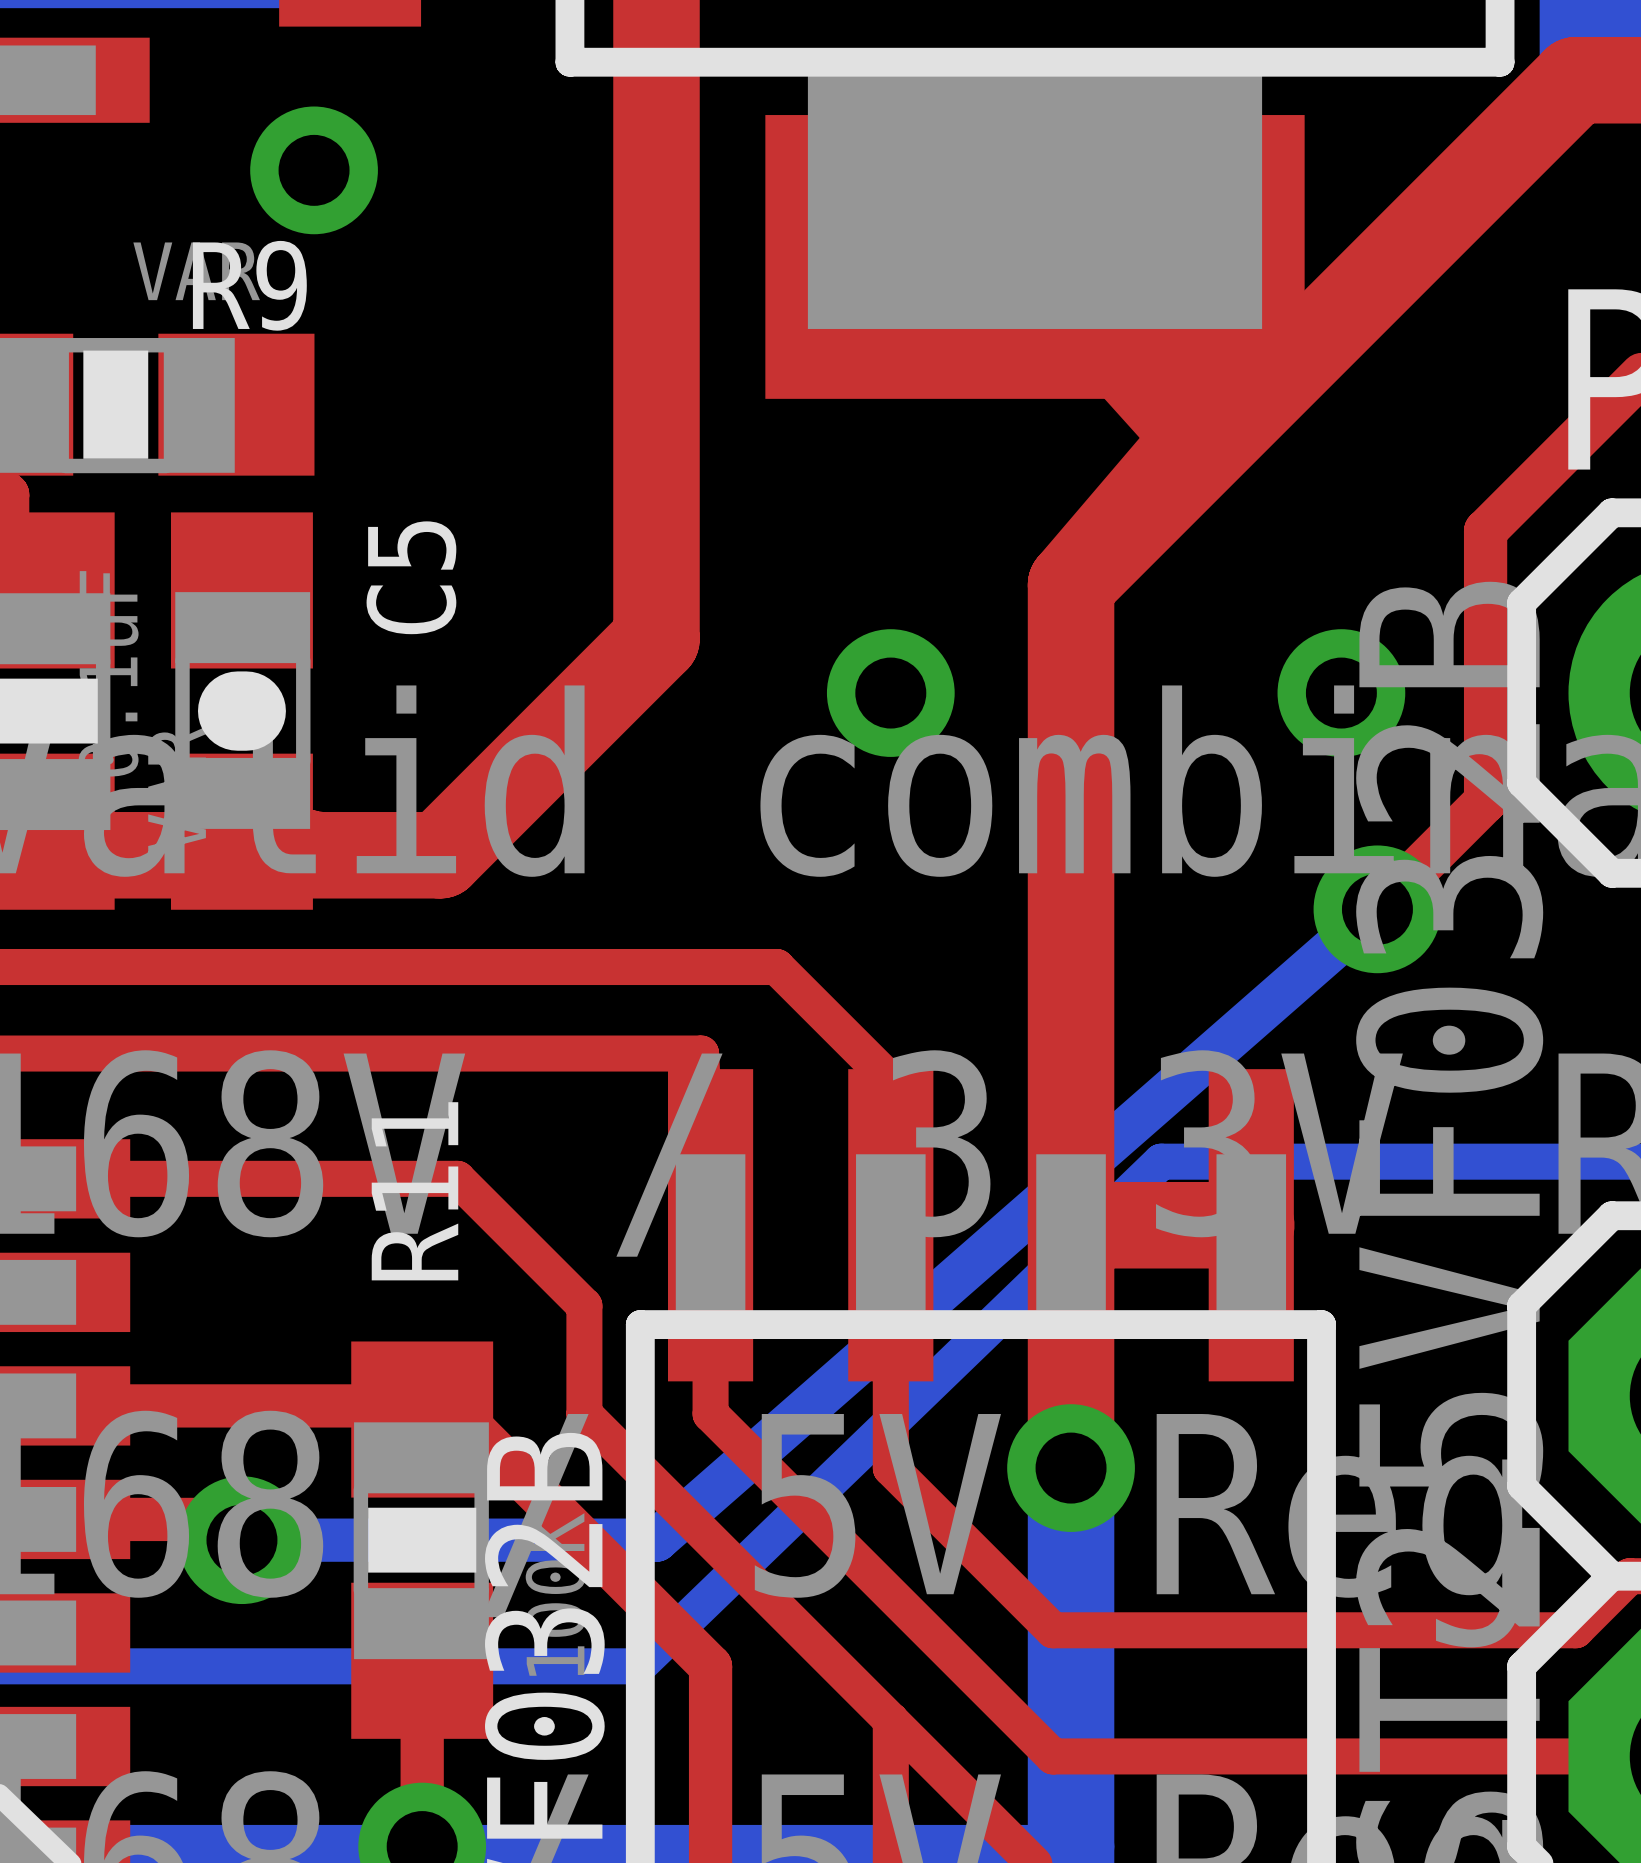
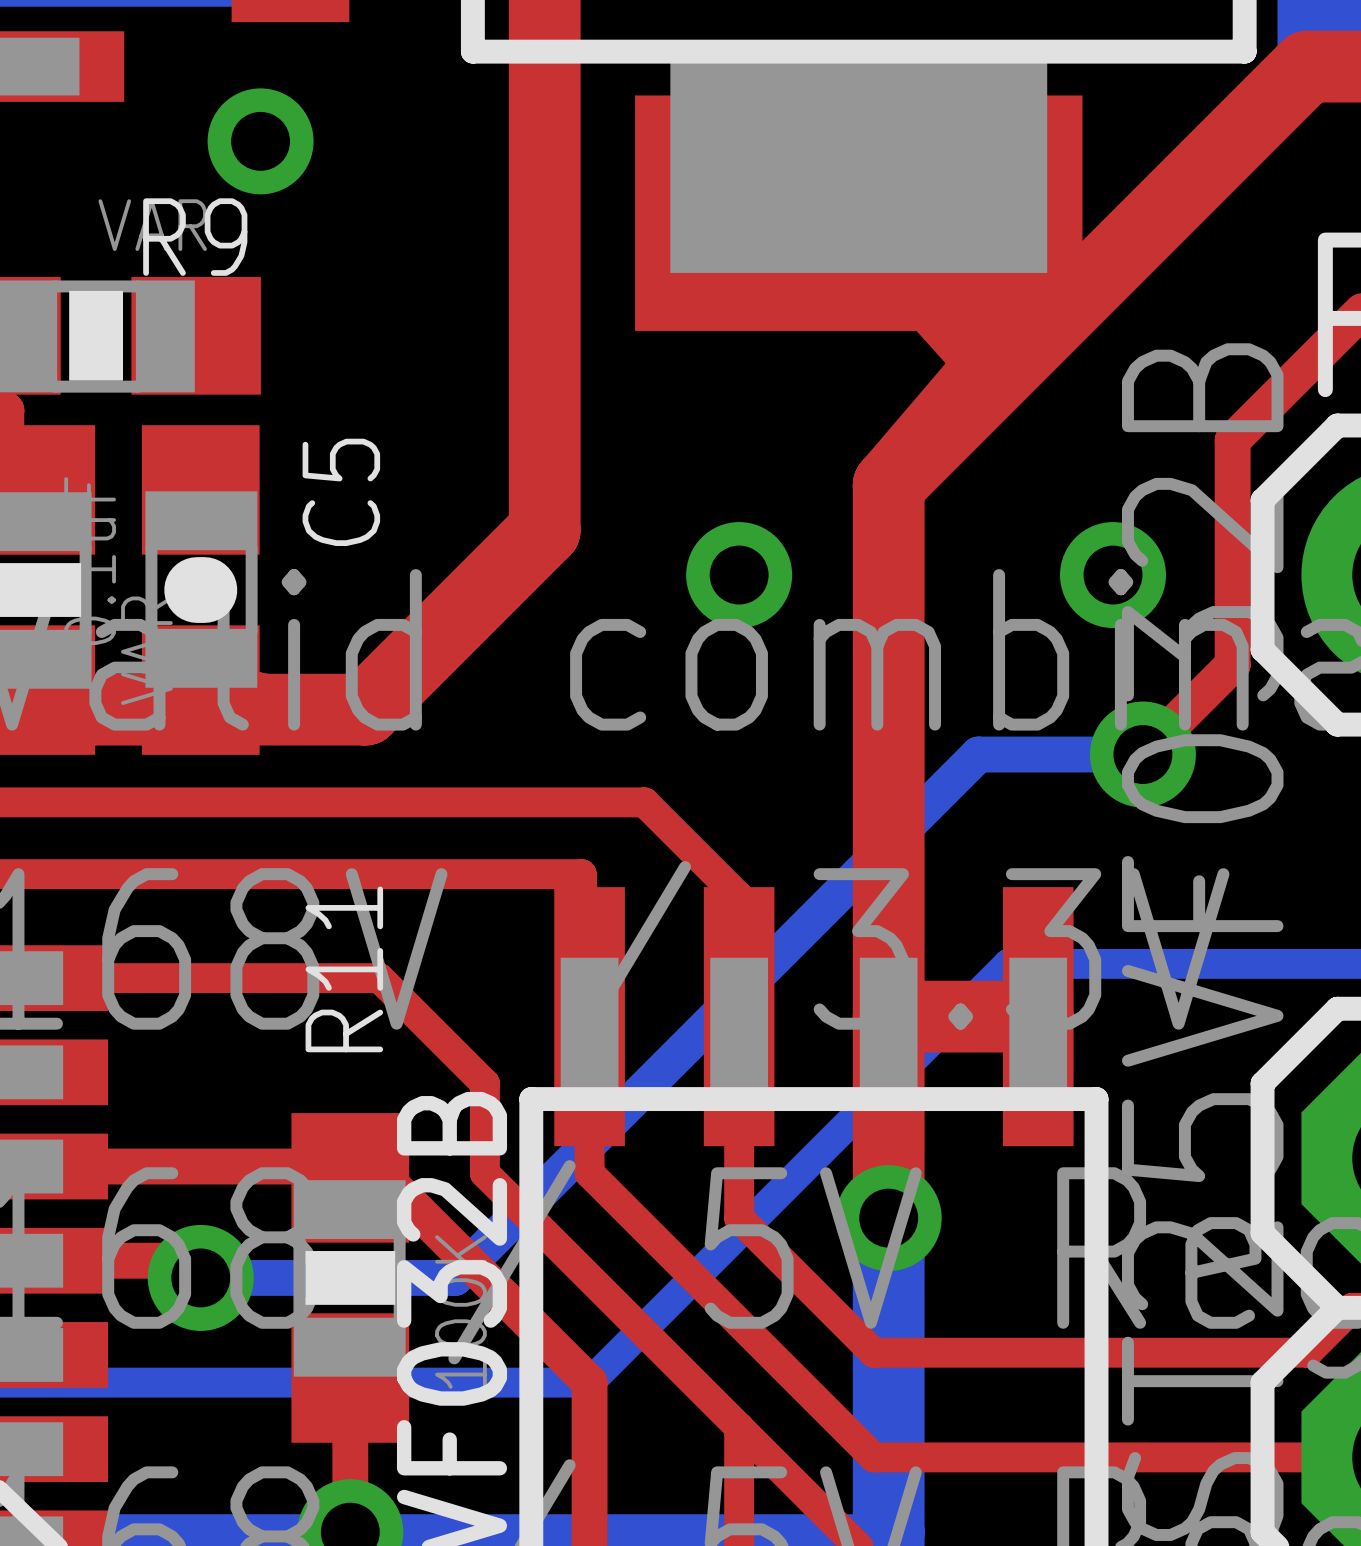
bottom track: (1377, 909) (656, 1540) (548, 1540) -> (1127, 754) (978, 754) (454, 1277)
bottom track: (1215, 1161) (1161, 1161) (638, 1666) -> (1008, 963) (589, 1382) (529, 1382)

